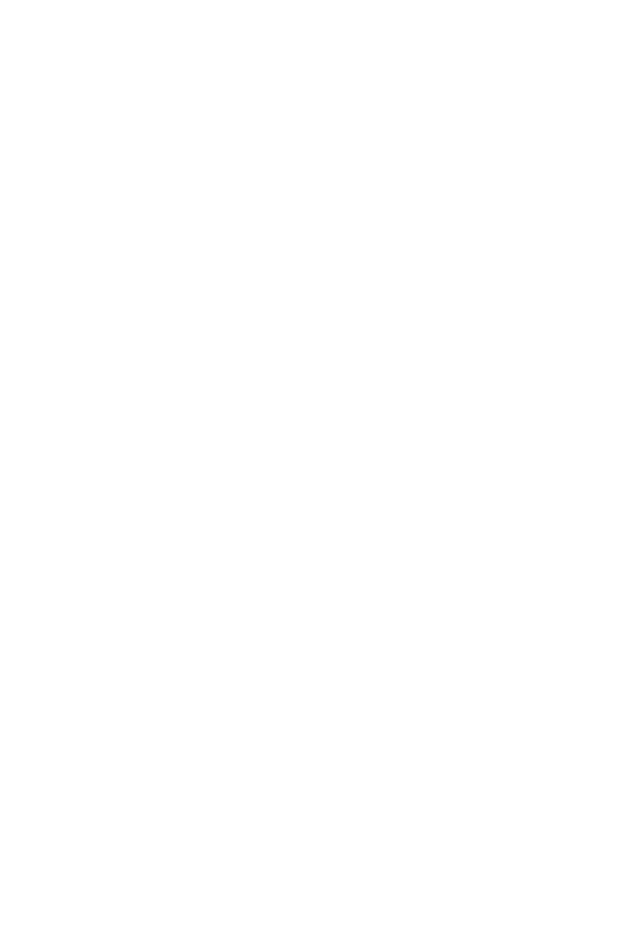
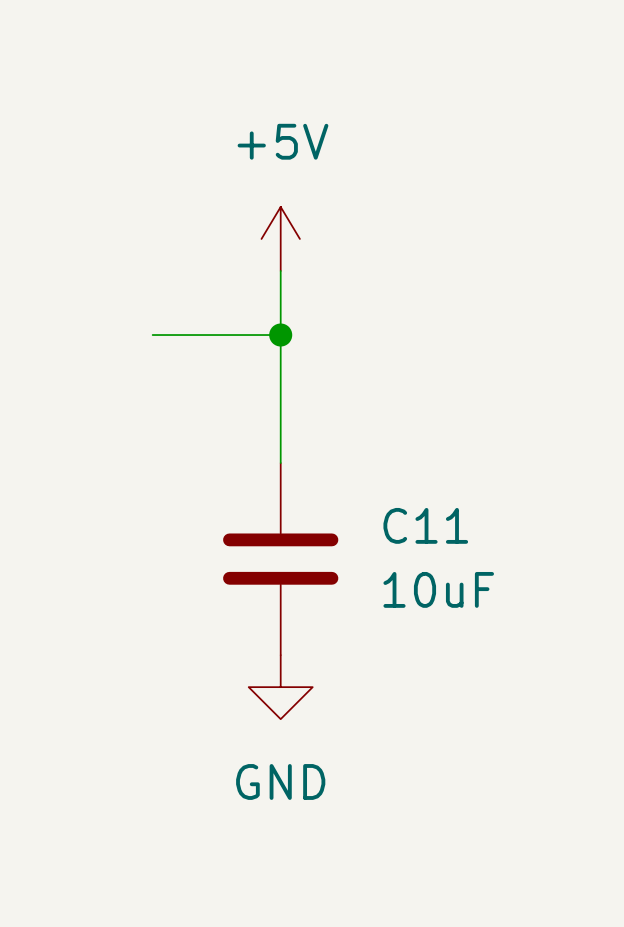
power symbol: none -> +5V (280, 238)
wire: none -> (280, 270) (280, 463)
wire: none -> (152, 335) (280, 335)
junction: none -> (280, 335)
C11: none -> 10uF (280, 559)
power symbol: none -> GND (280, 687)

